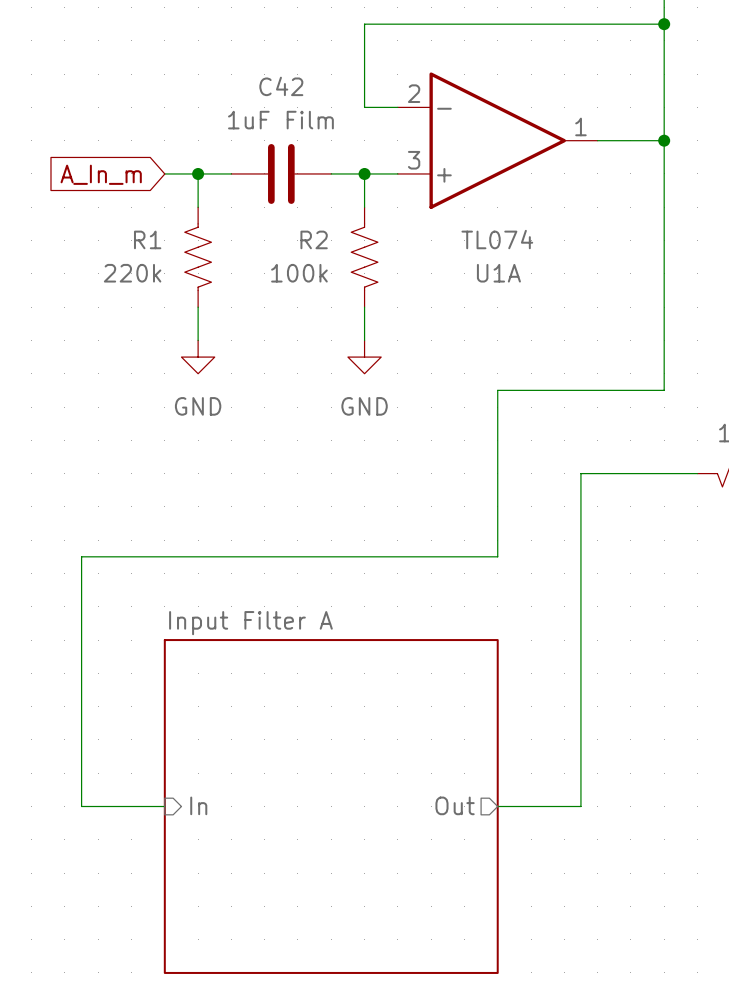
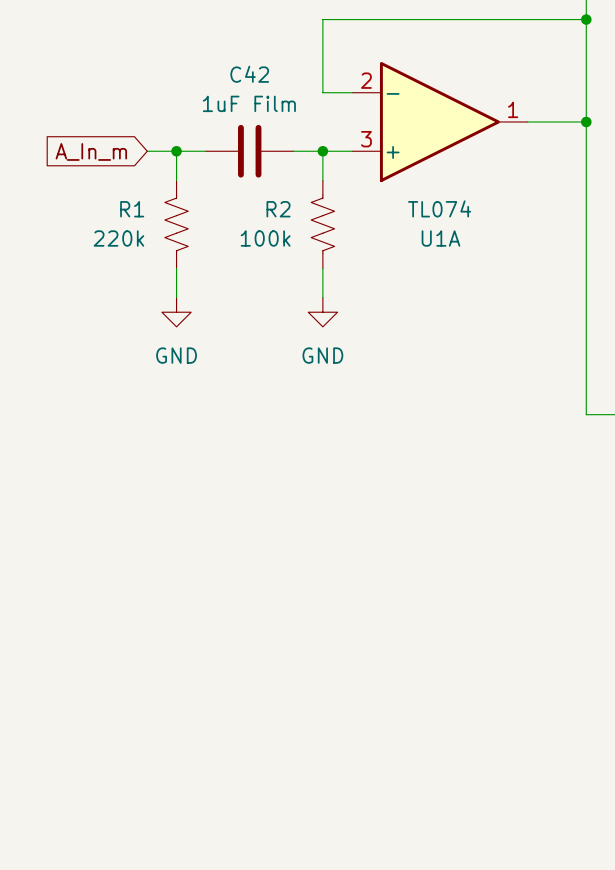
wire: (664, 390) (497, 390) (497, 556) (81, 556) (81, 806) (164, 806) -> none
wire: (664, 473) (580, 473) (580, 806) (497, 806) -> (586, 414) (586, 341)
sheet pin: In (198, 805) -> none
sheet pin: Out (455, 805) -> none
sheet Input Filter A: (331, 806) -> none

